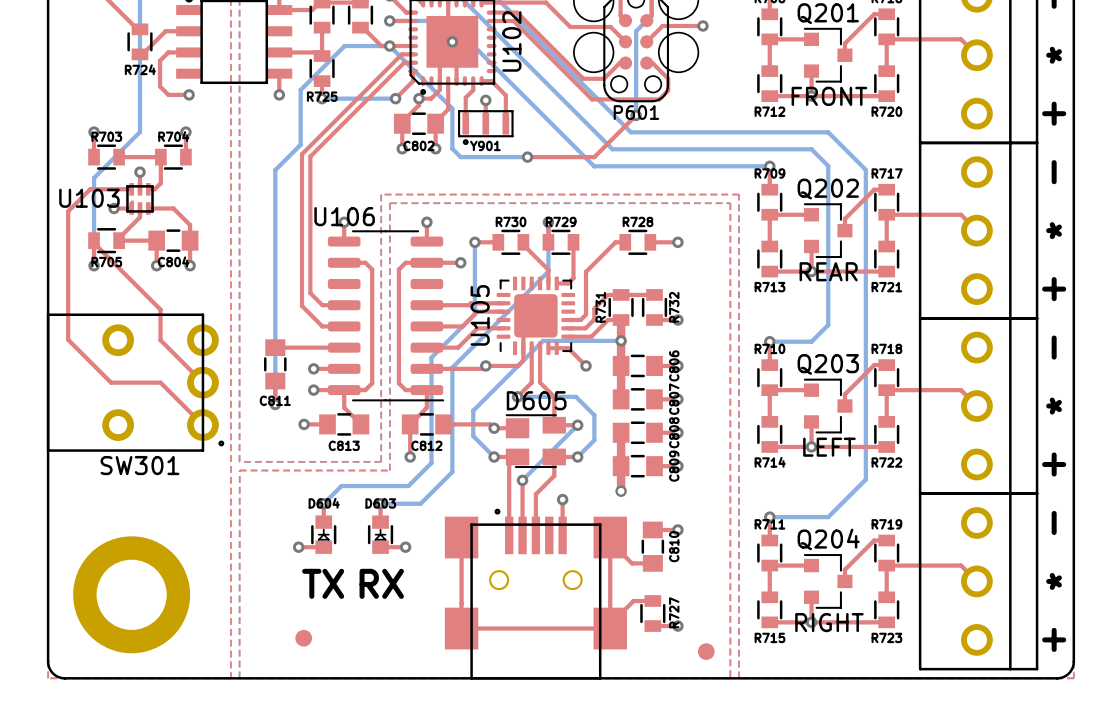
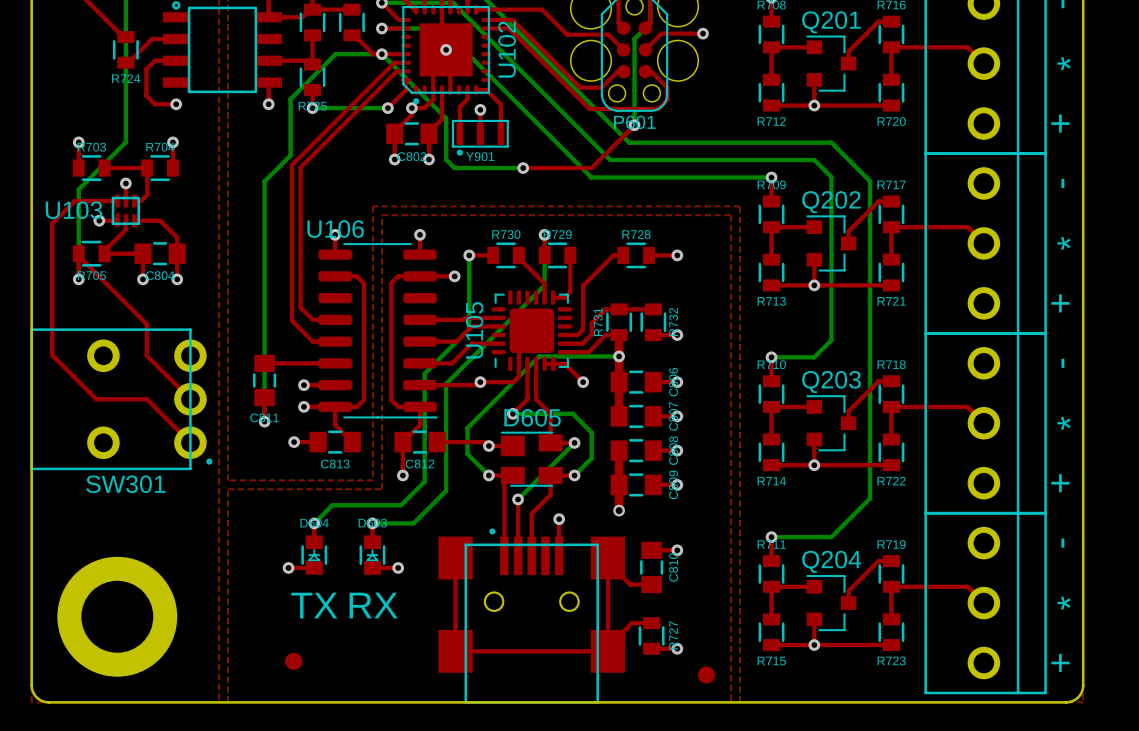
text: FRONT (829, 96) -> none
text: REAR (828, 271) -> none
text: LEFT (829, 447) -> none
text: RIGHT (829, 622) -> none

